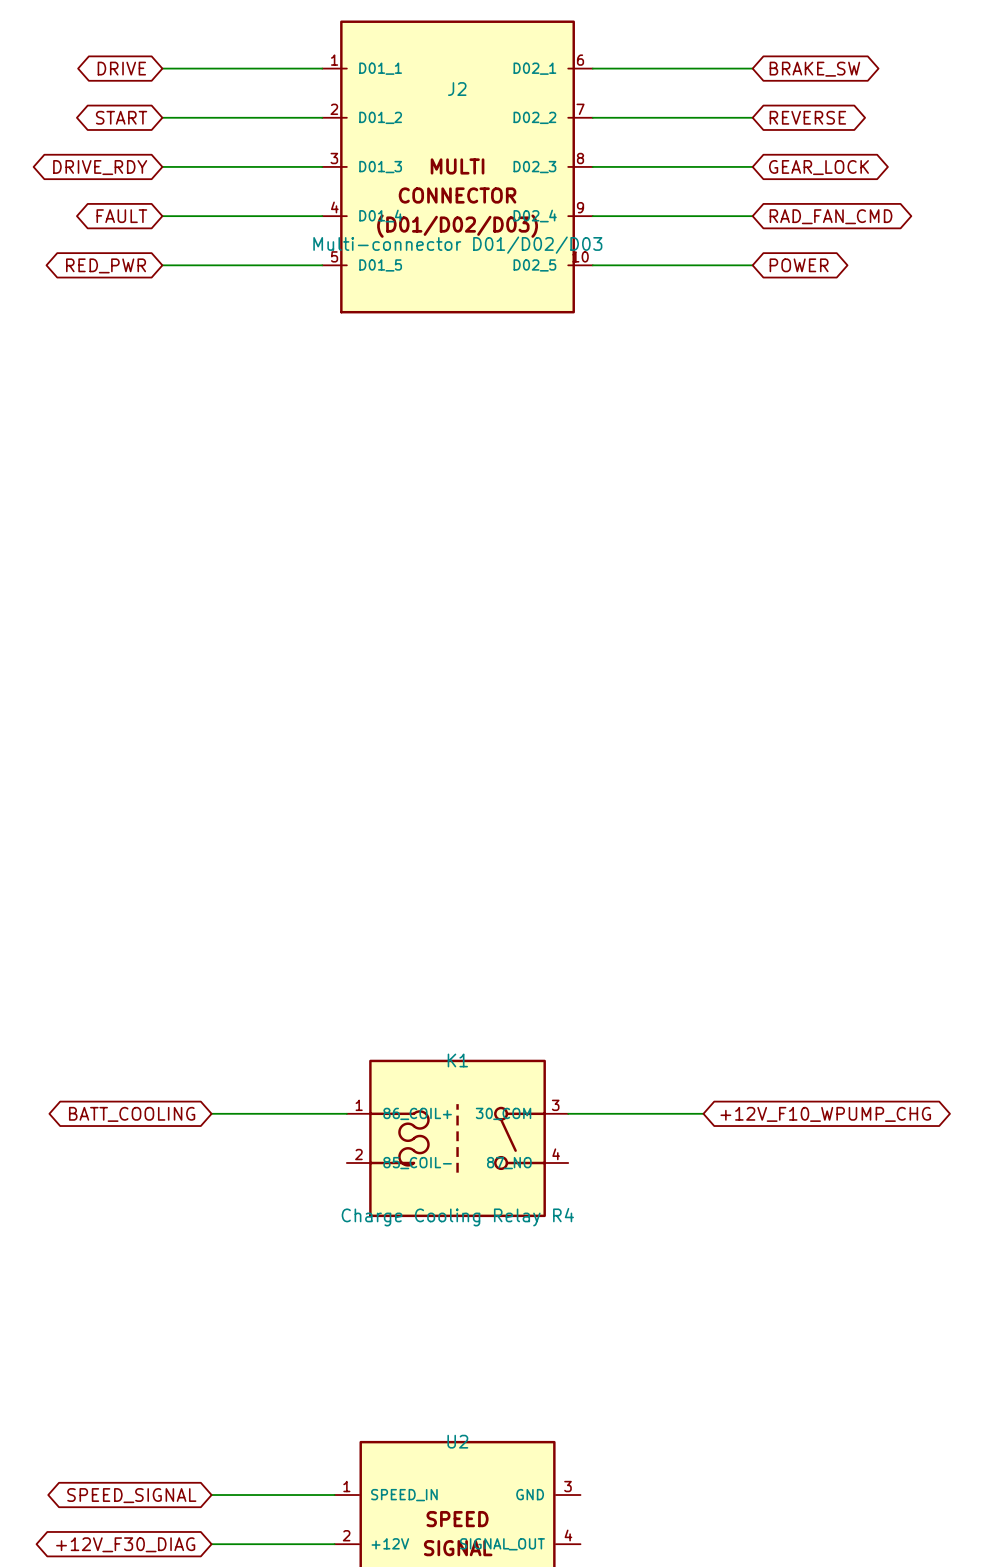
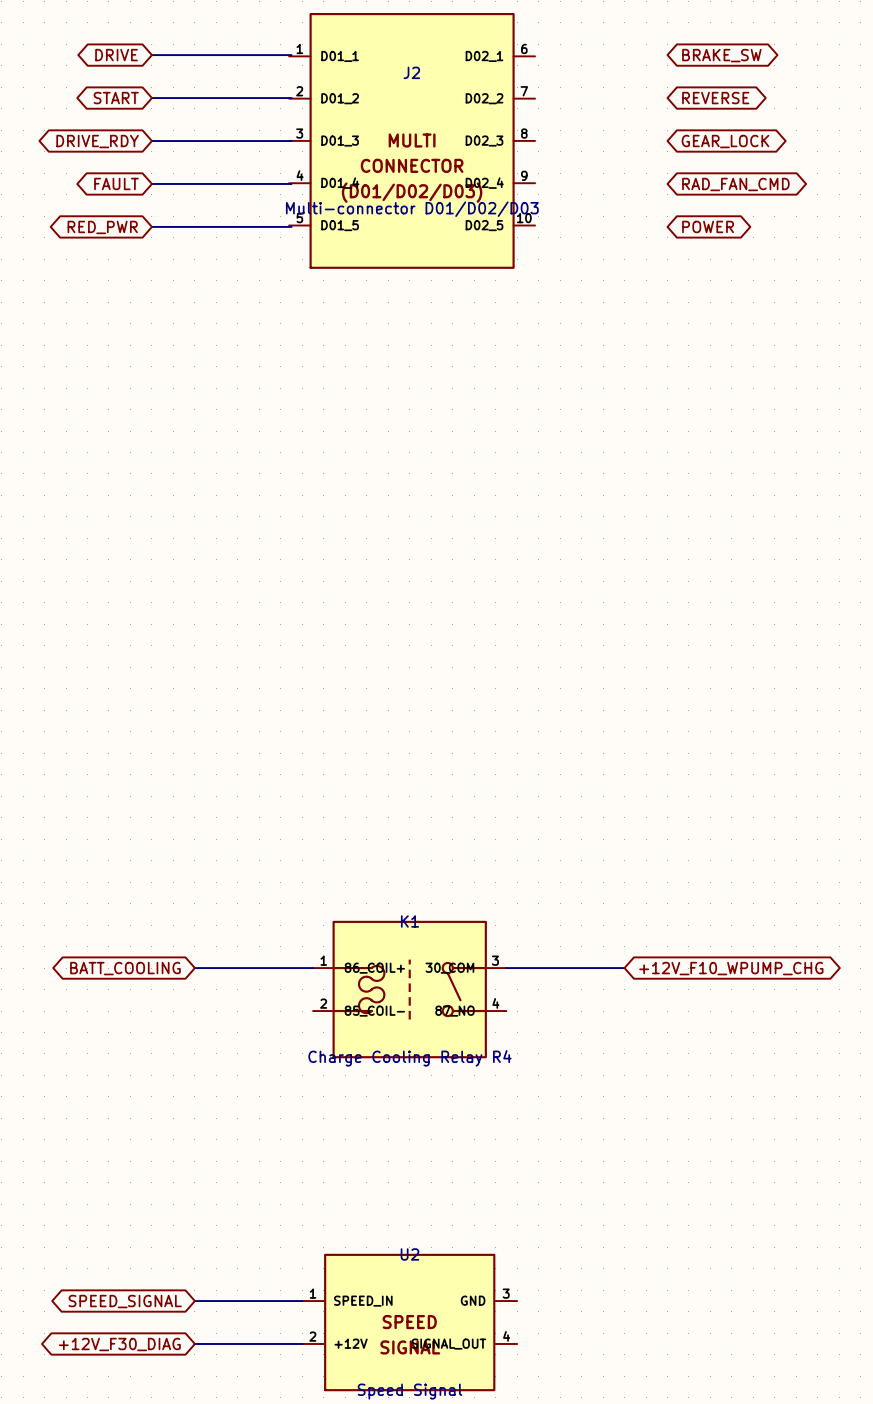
J2 symbol: [322, 20, 593, 314] -> [289, 12, 536, 269]
wire: (592, 68) (752, 68) -> none
wire: (592, 117) (752, 117) -> none
wire: (592, 166) (752, 166) -> none
wire: (592, 216) (752, 216) -> none
wire: (592, 265) (752, 265) -> none

